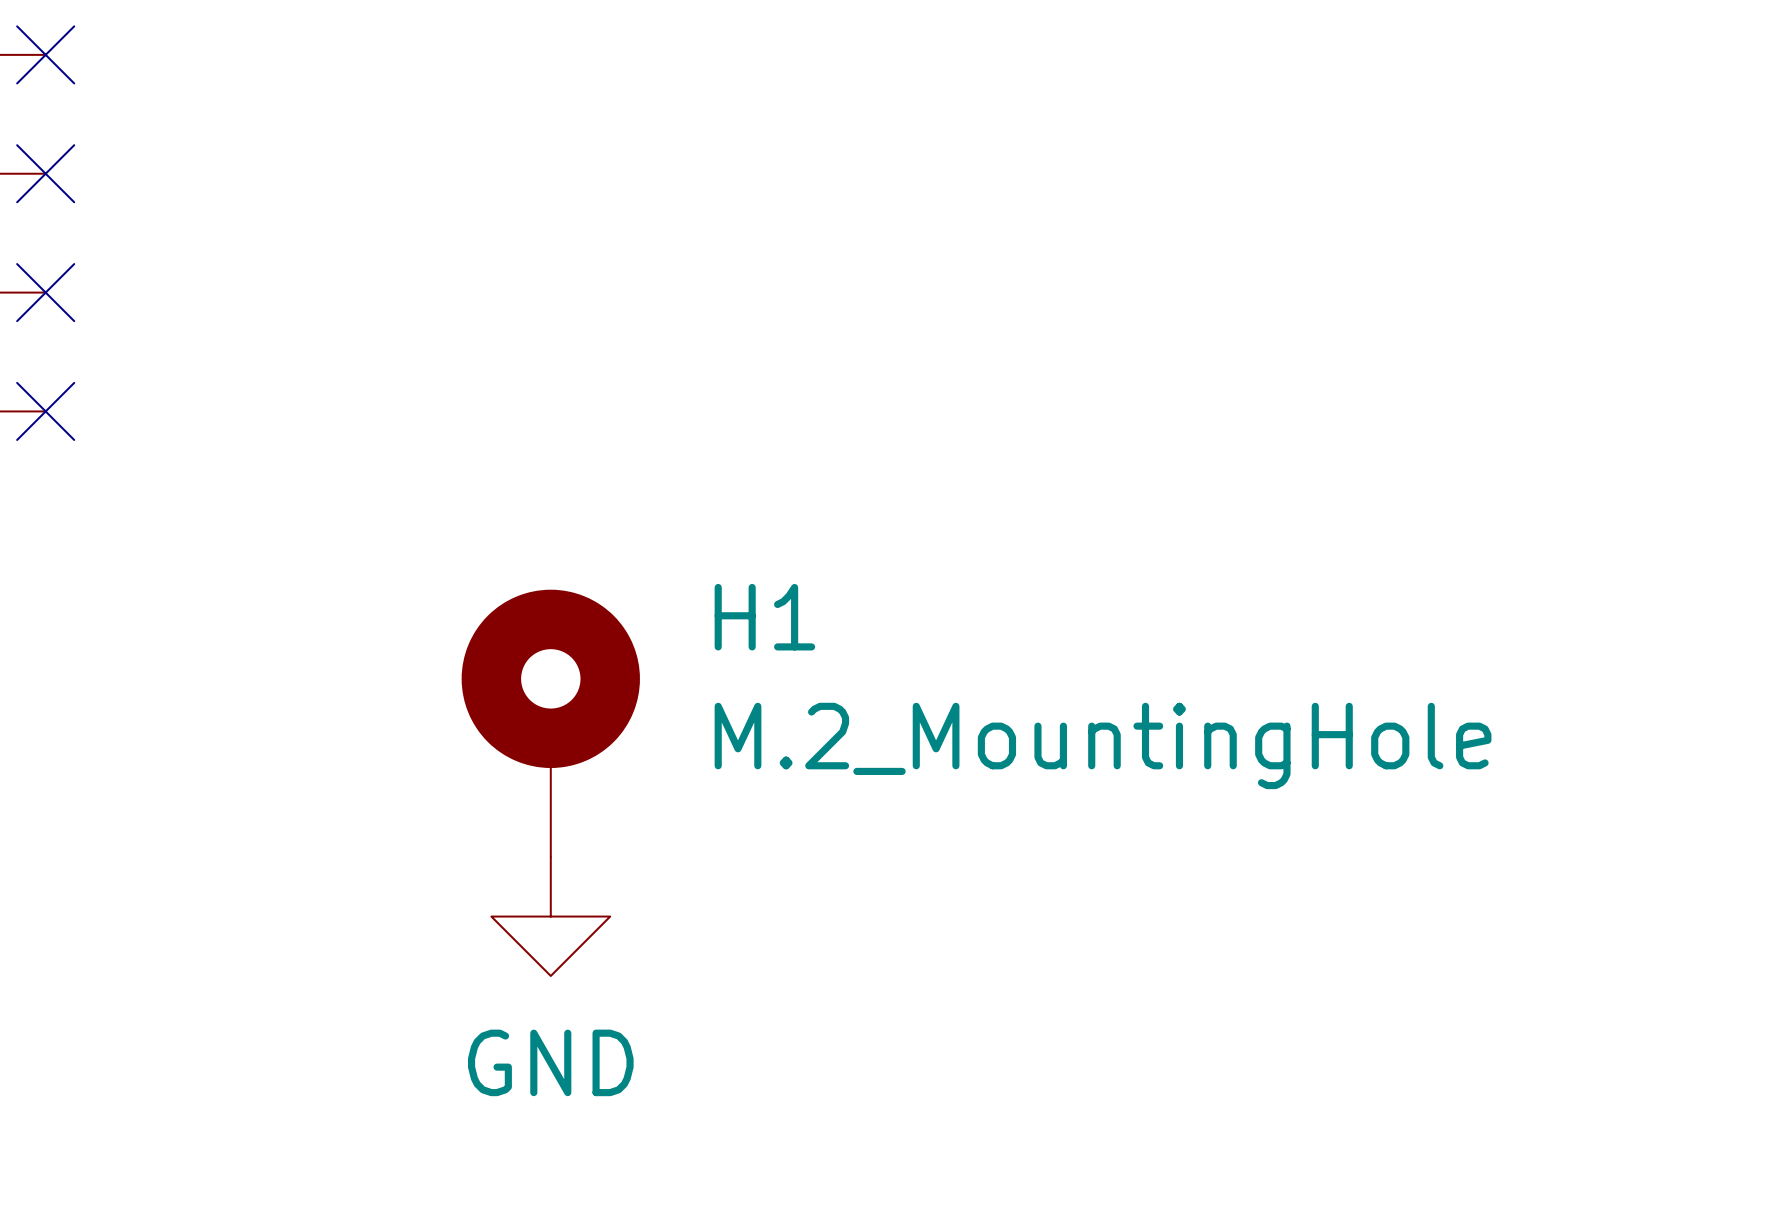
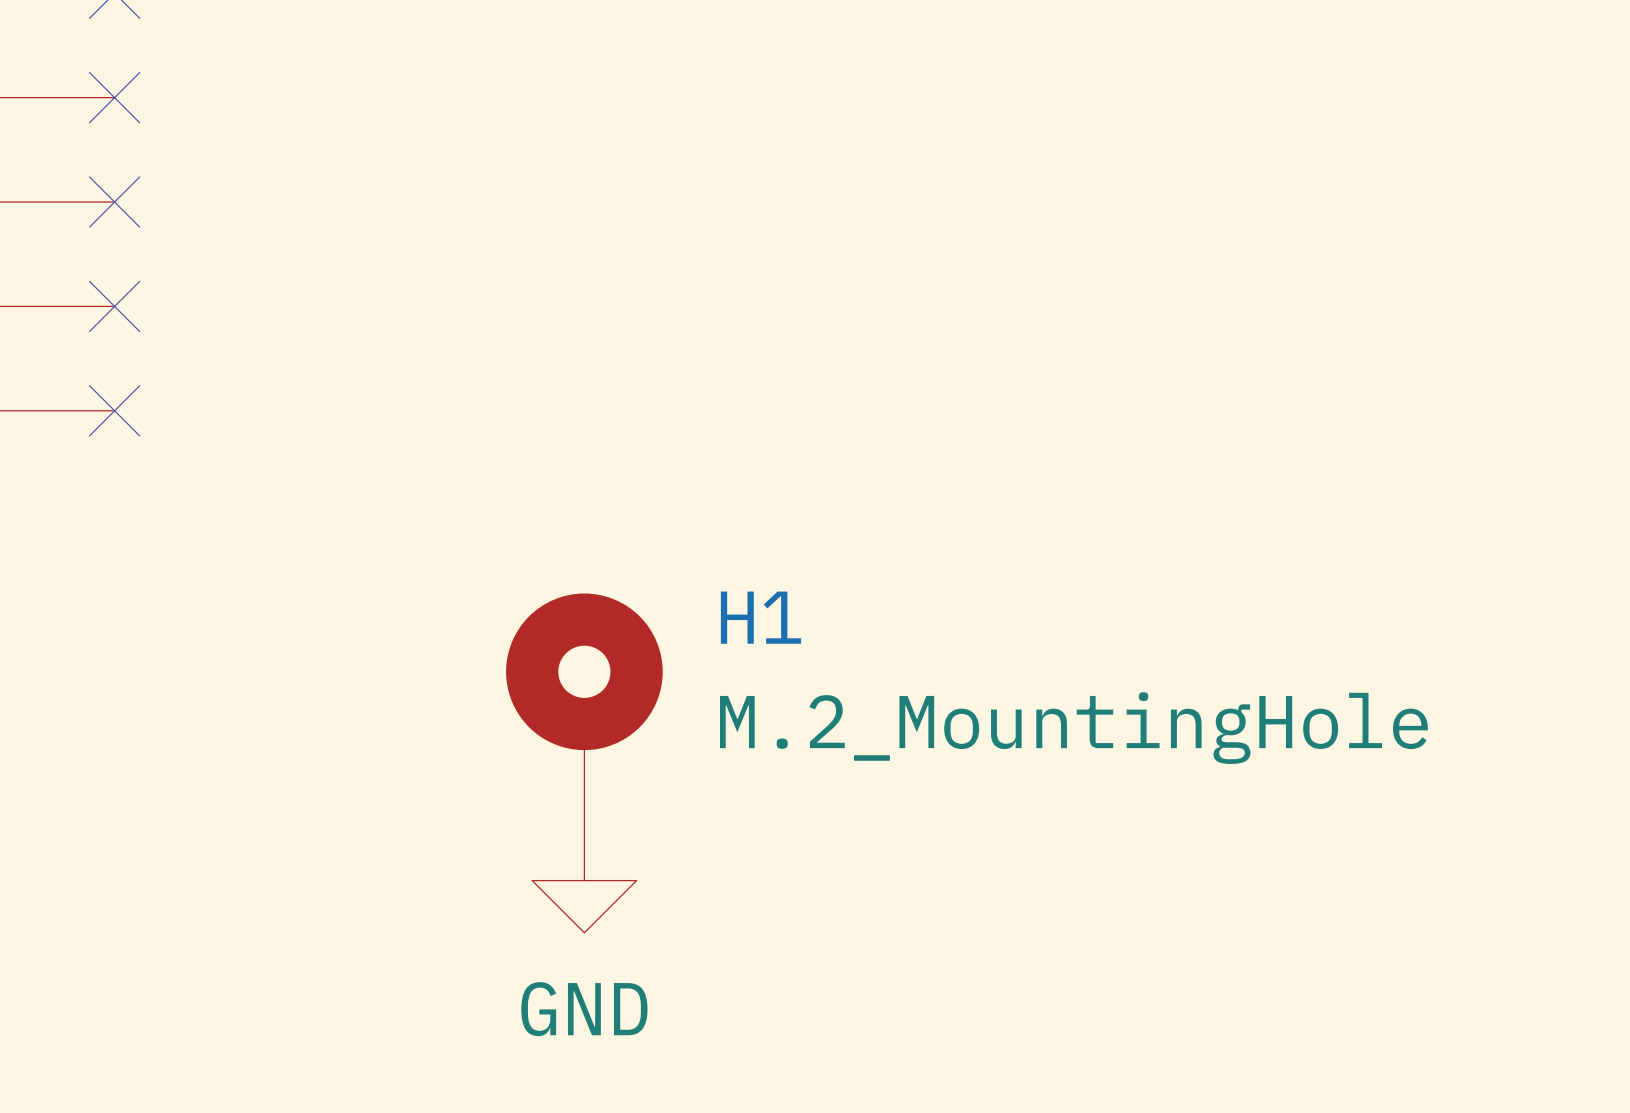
H1 position: (550, 723) -> (584, 710)
power symbol position: GND (550, 916) -> GND (584, 880)

